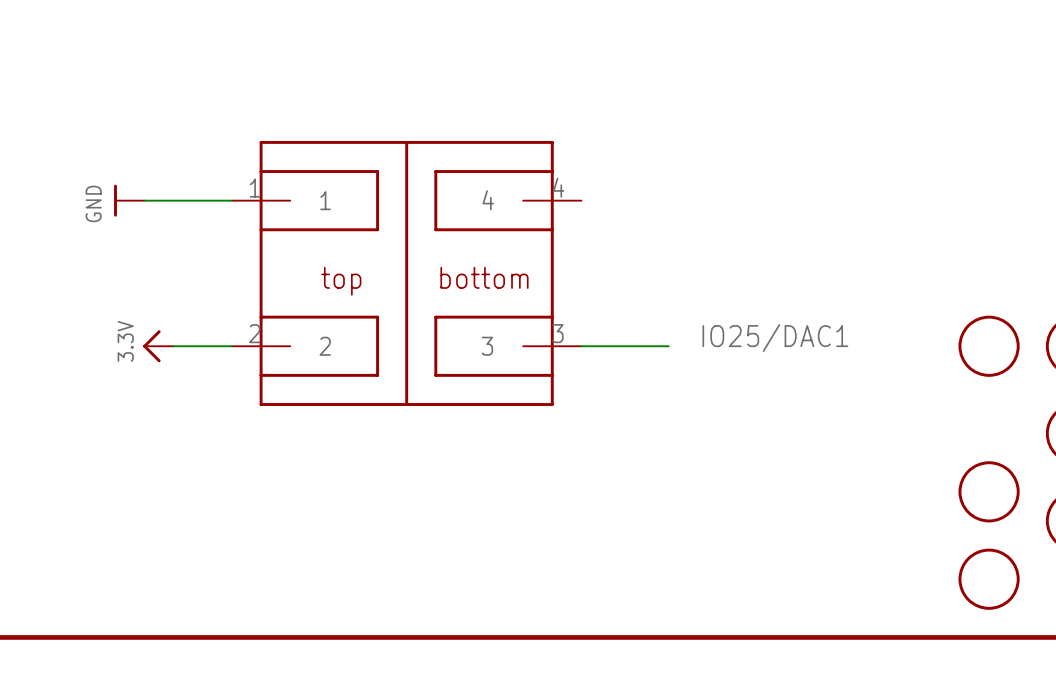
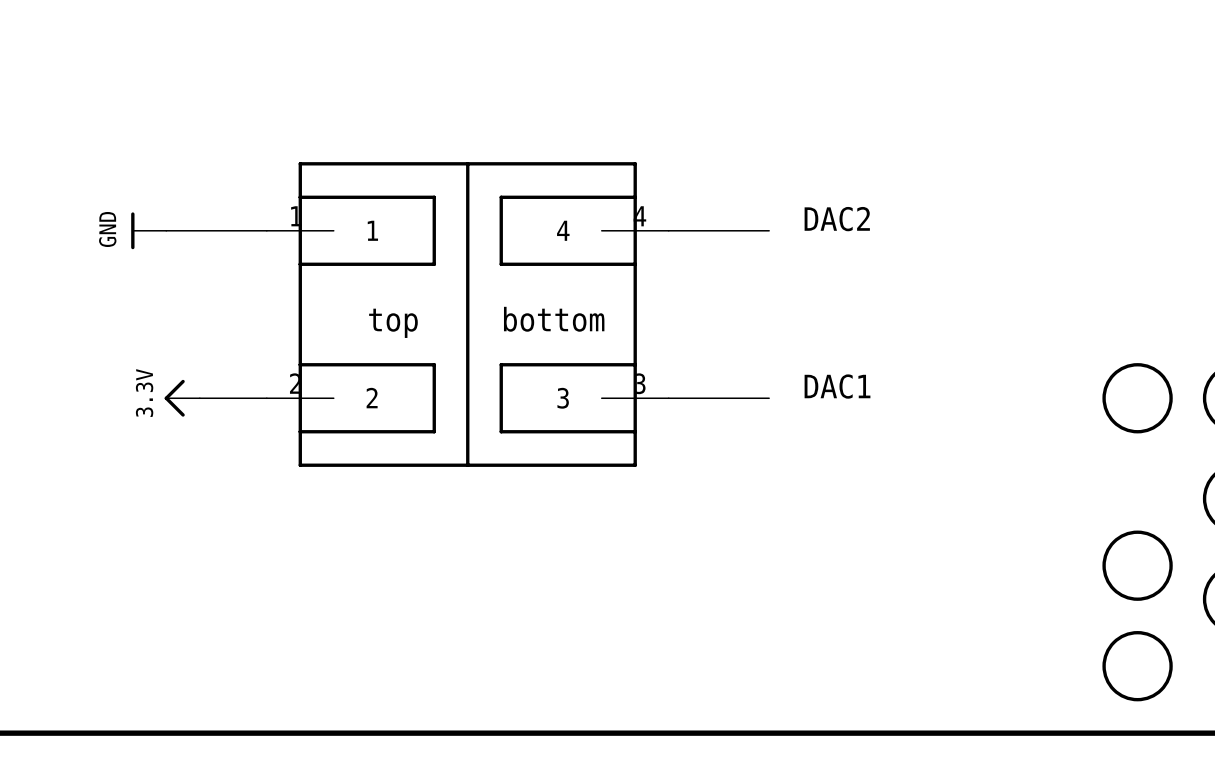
label: none -> DAC2 (837, 219)
wire: none -> (668, 230) (769, 230)
label: IO25/DAC1 (775, 338) -> DAC1 (837, 386)

